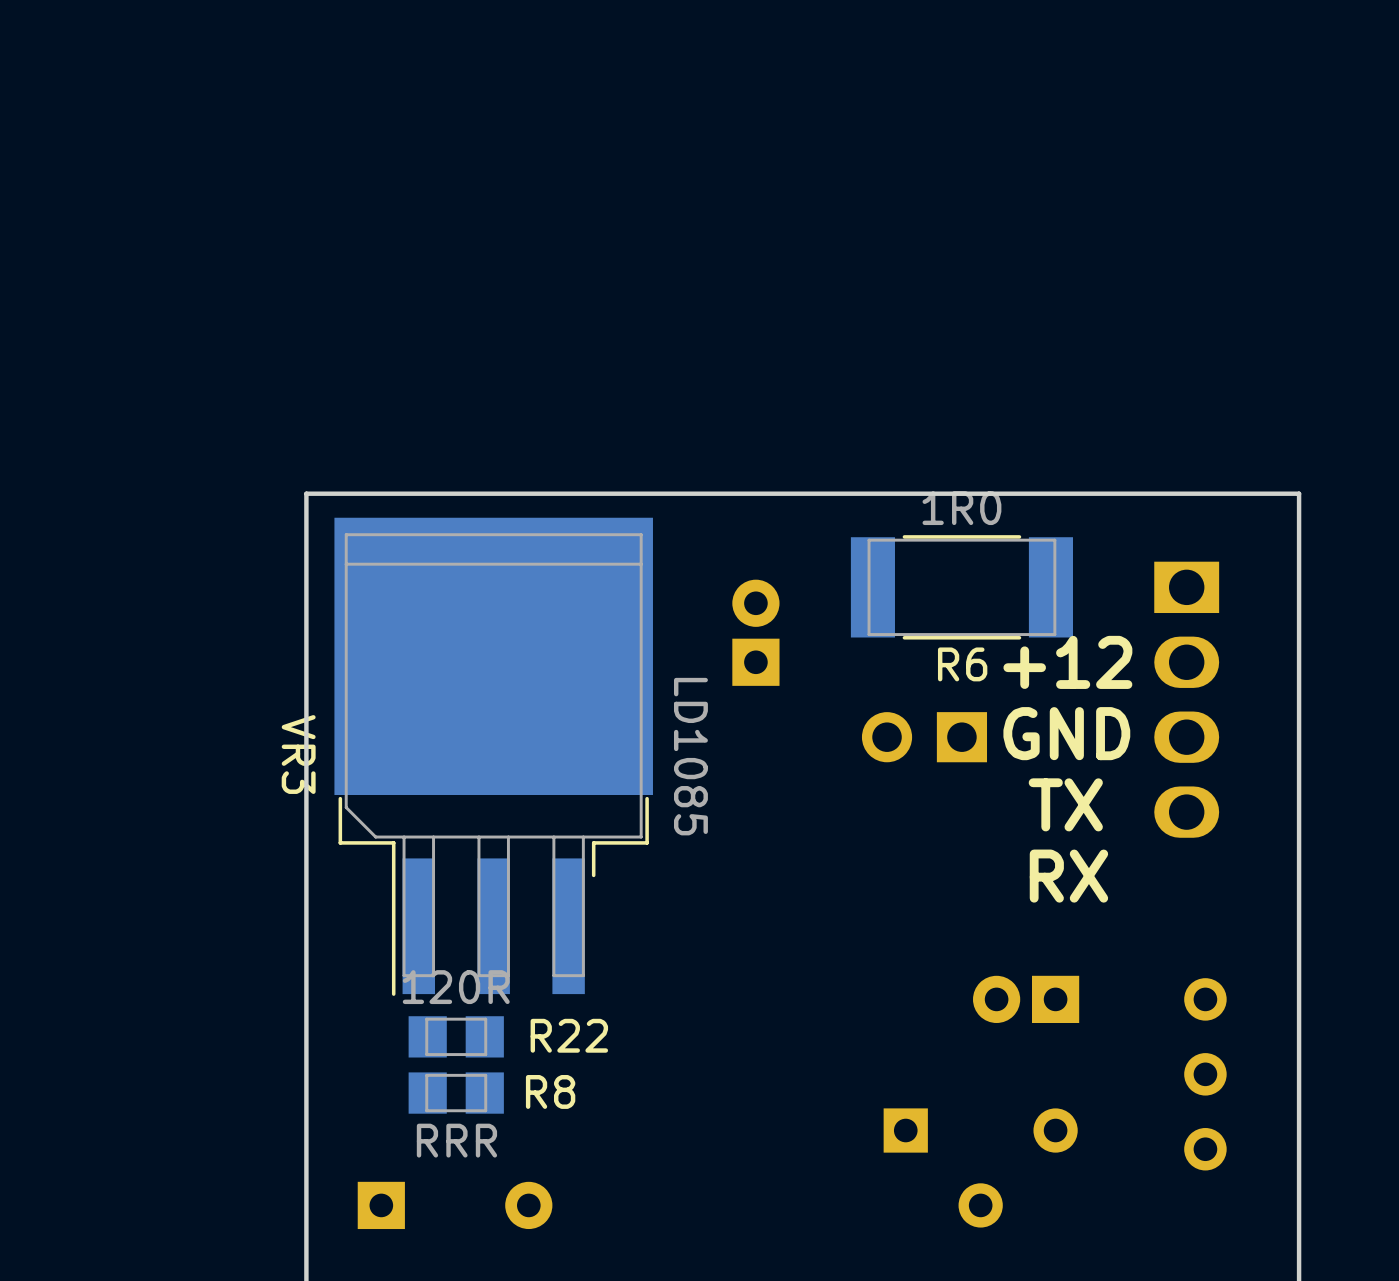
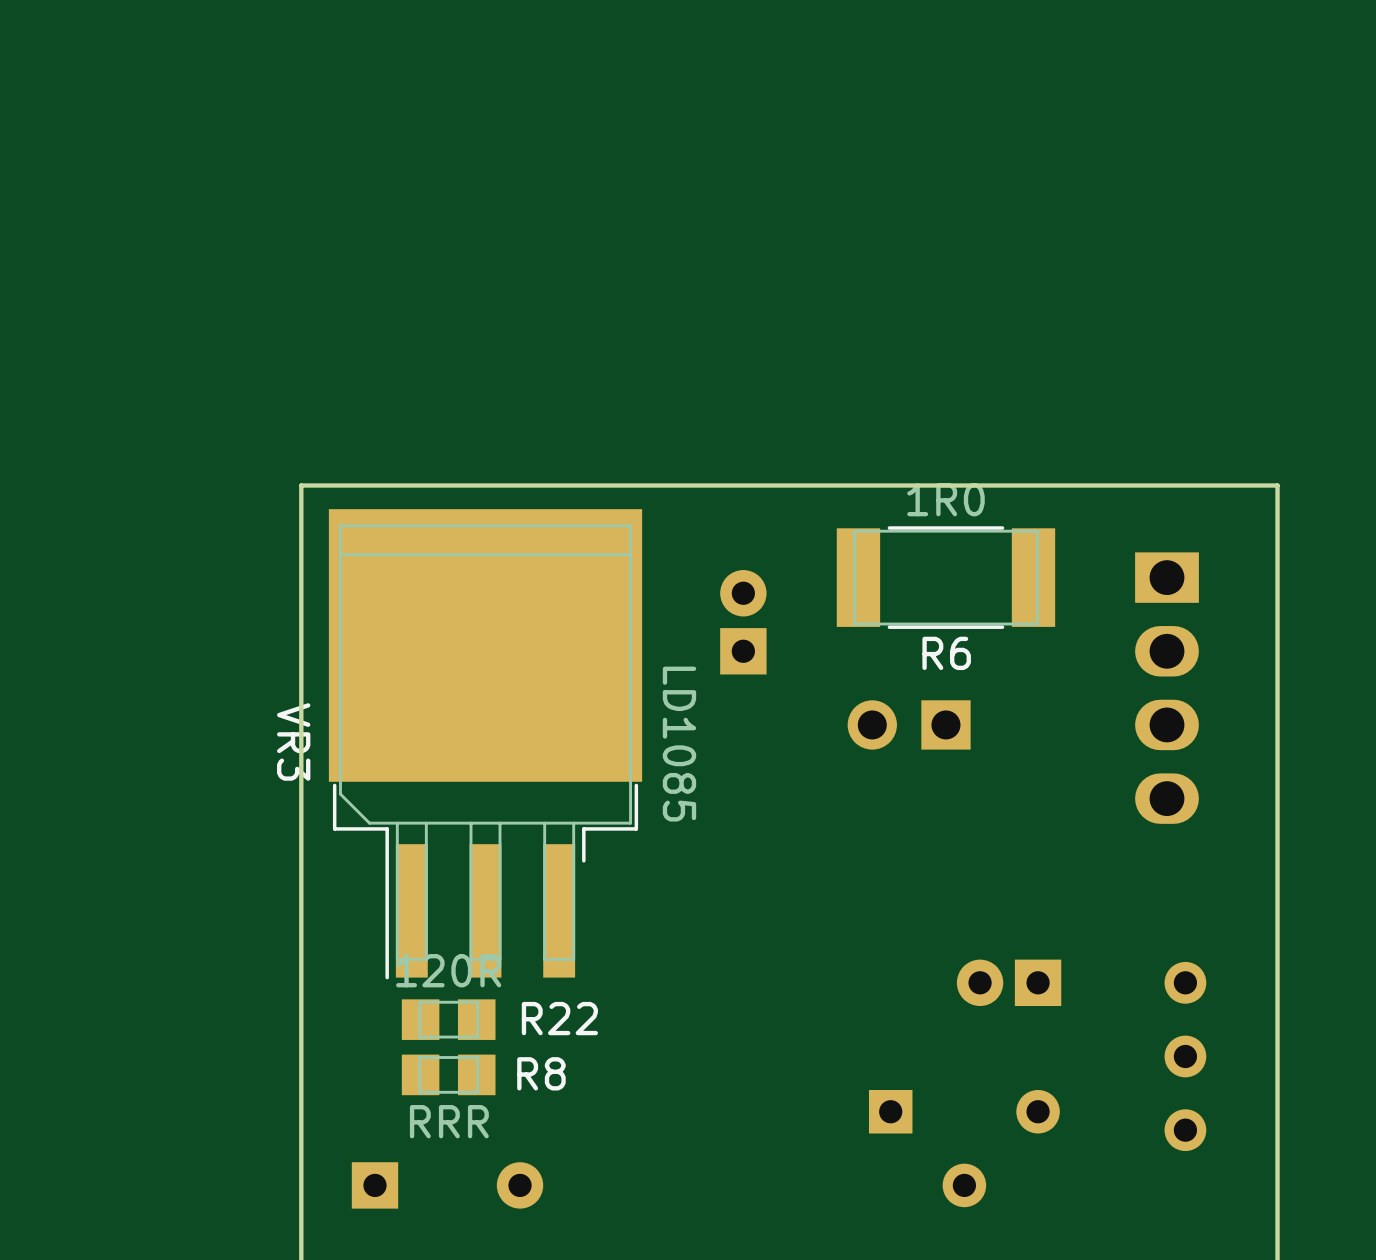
text: +12 (1067, 662) -> none
text: GND (1066, 733) -> none
text: TX (1065, 804) -> none
text: RX (1068, 876) -> none

